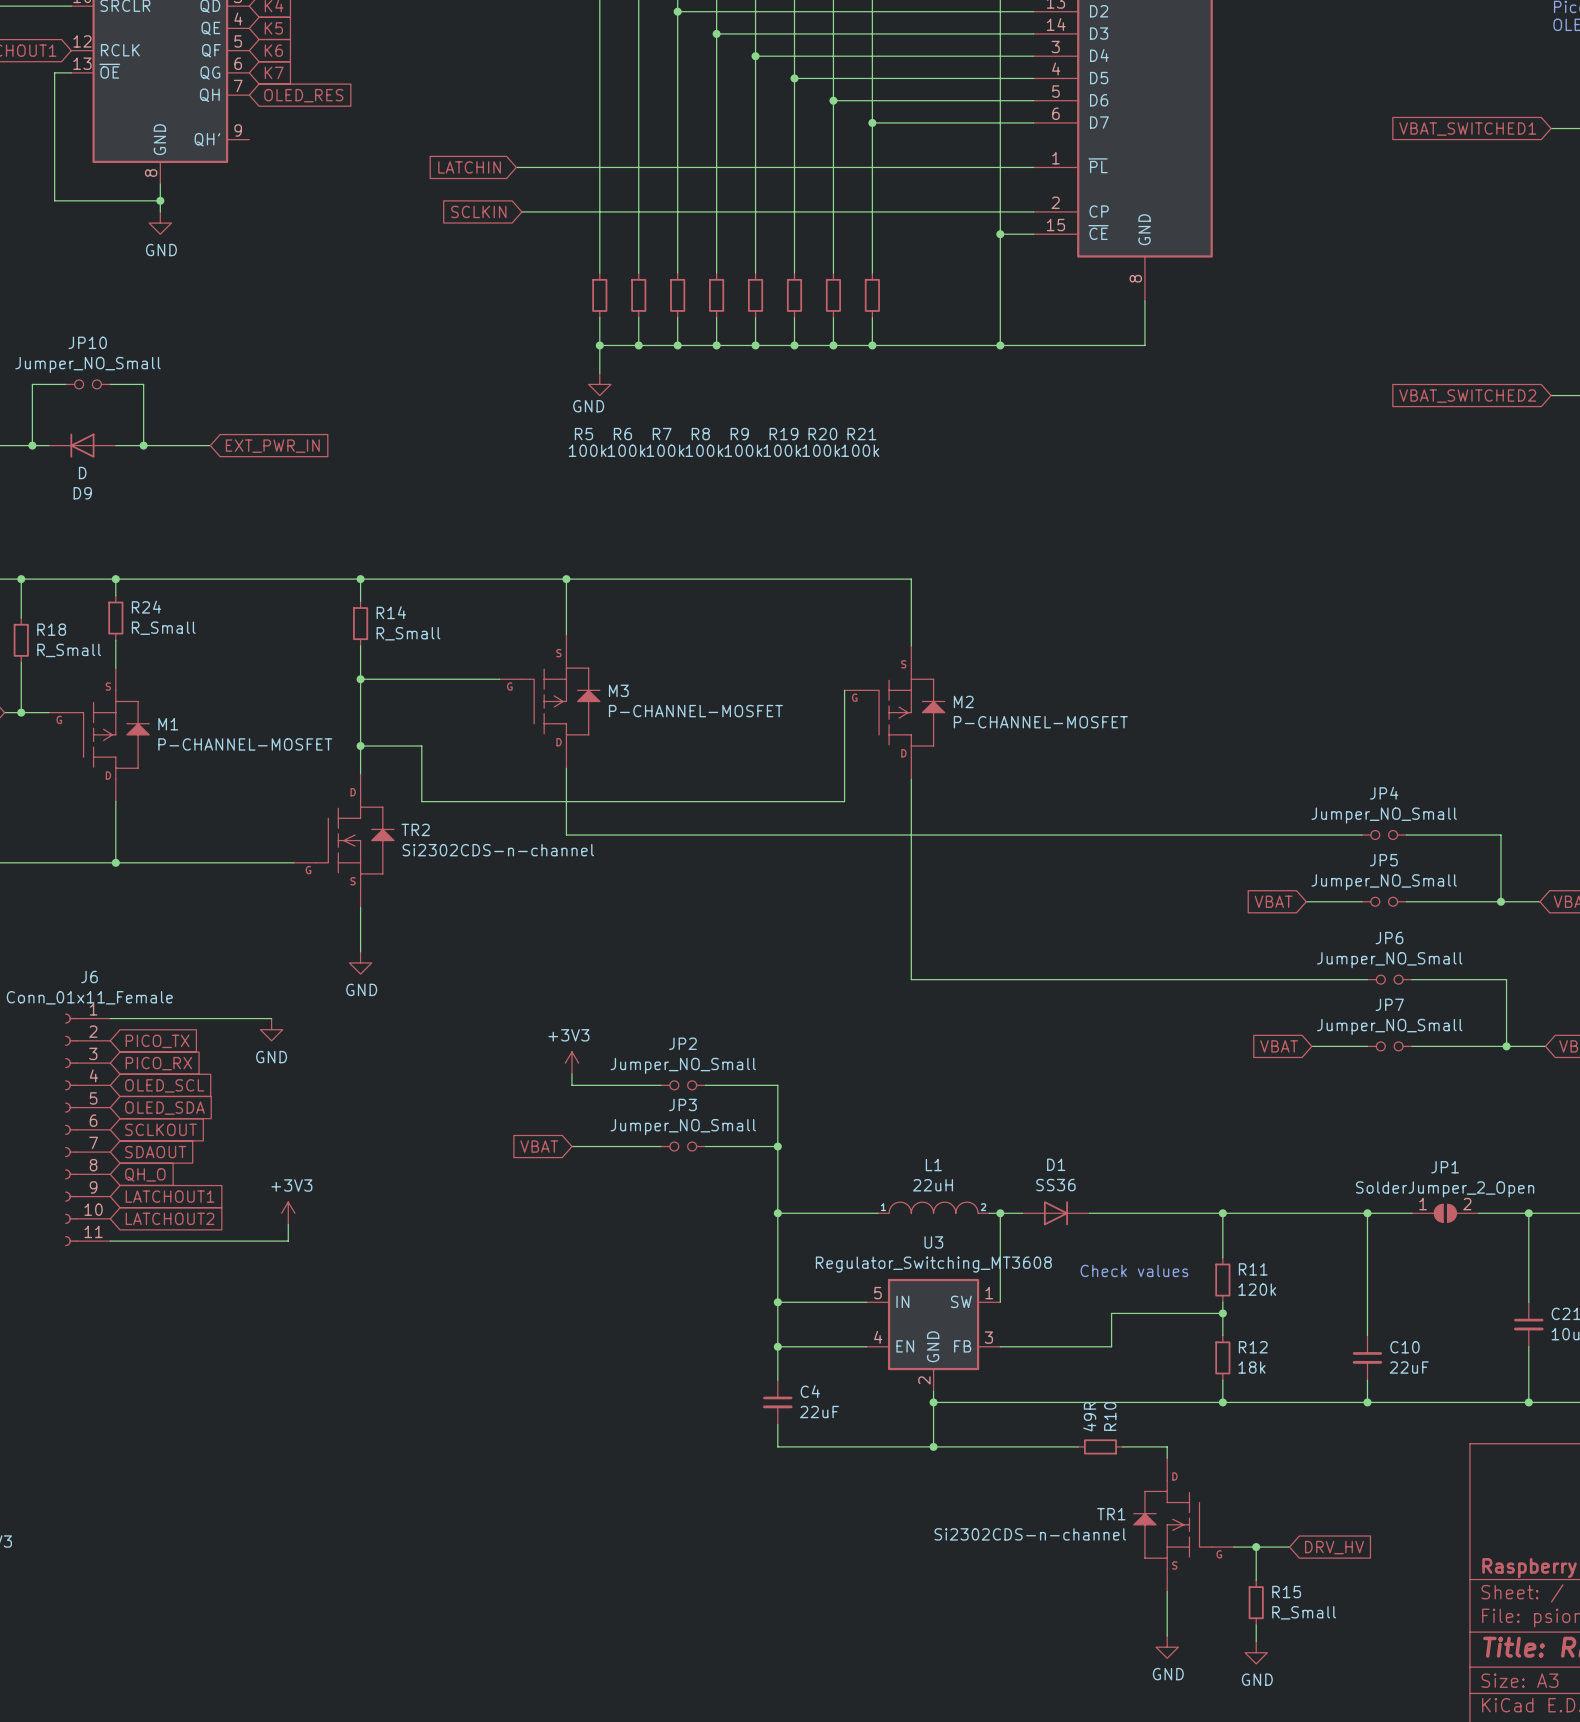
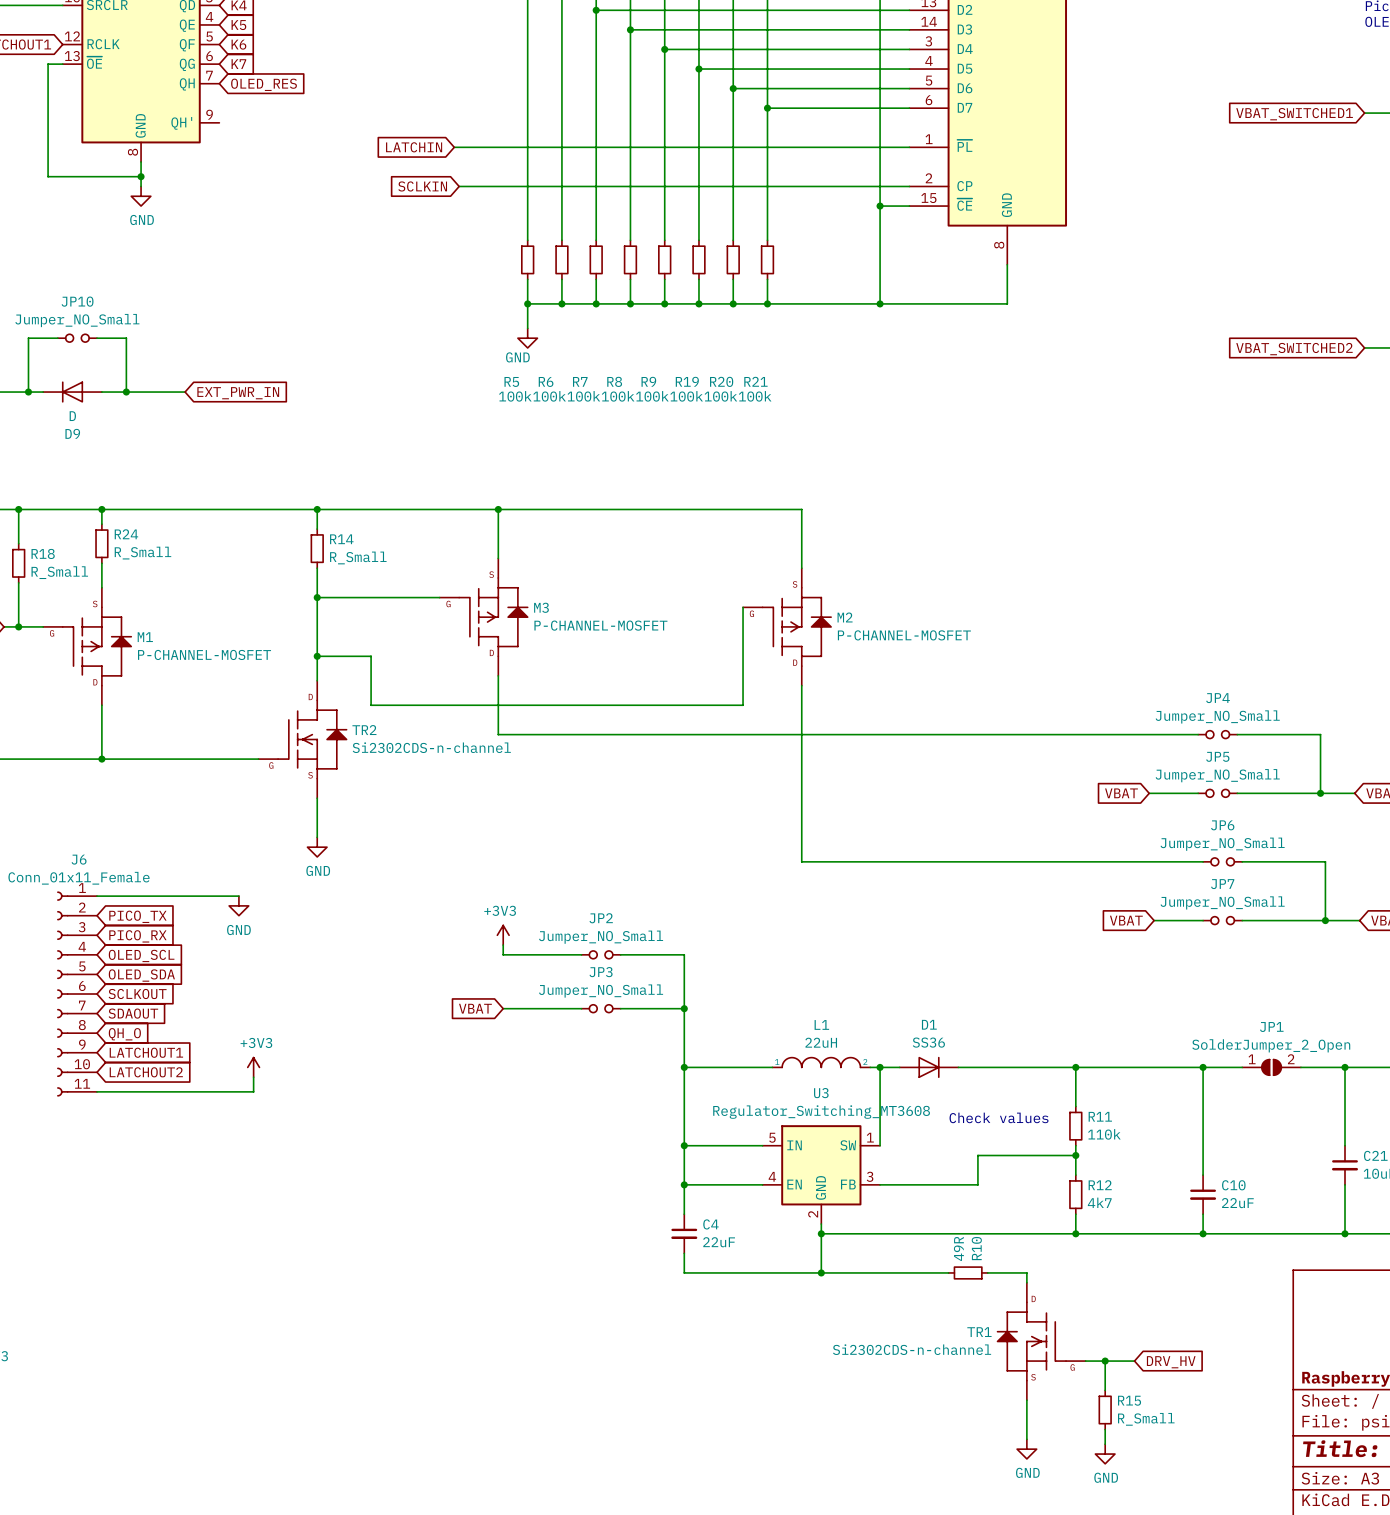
R11 value: 120k (1257, 1289) -> 110k (1104, 1134)
R12 value: 18k (1251, 1367) -> 4k7 (1099, 1202)

